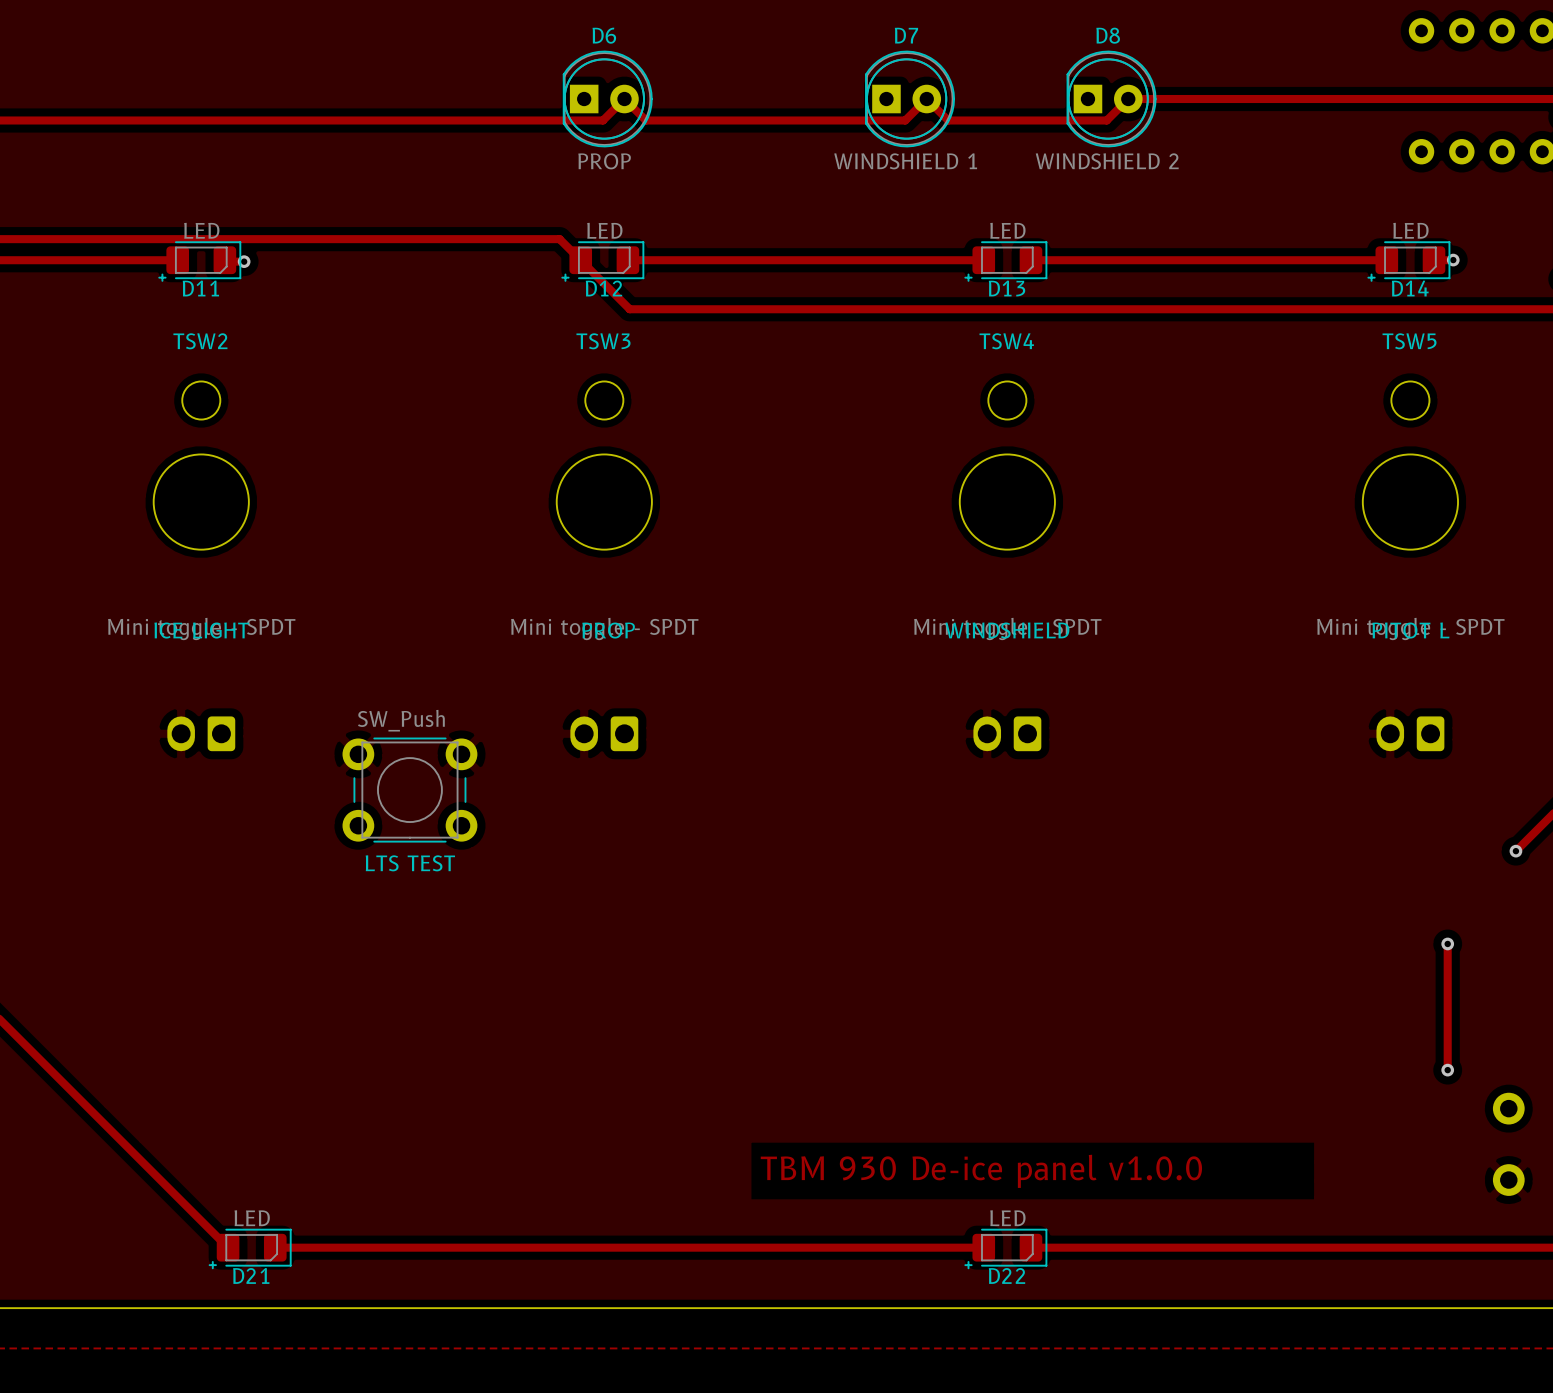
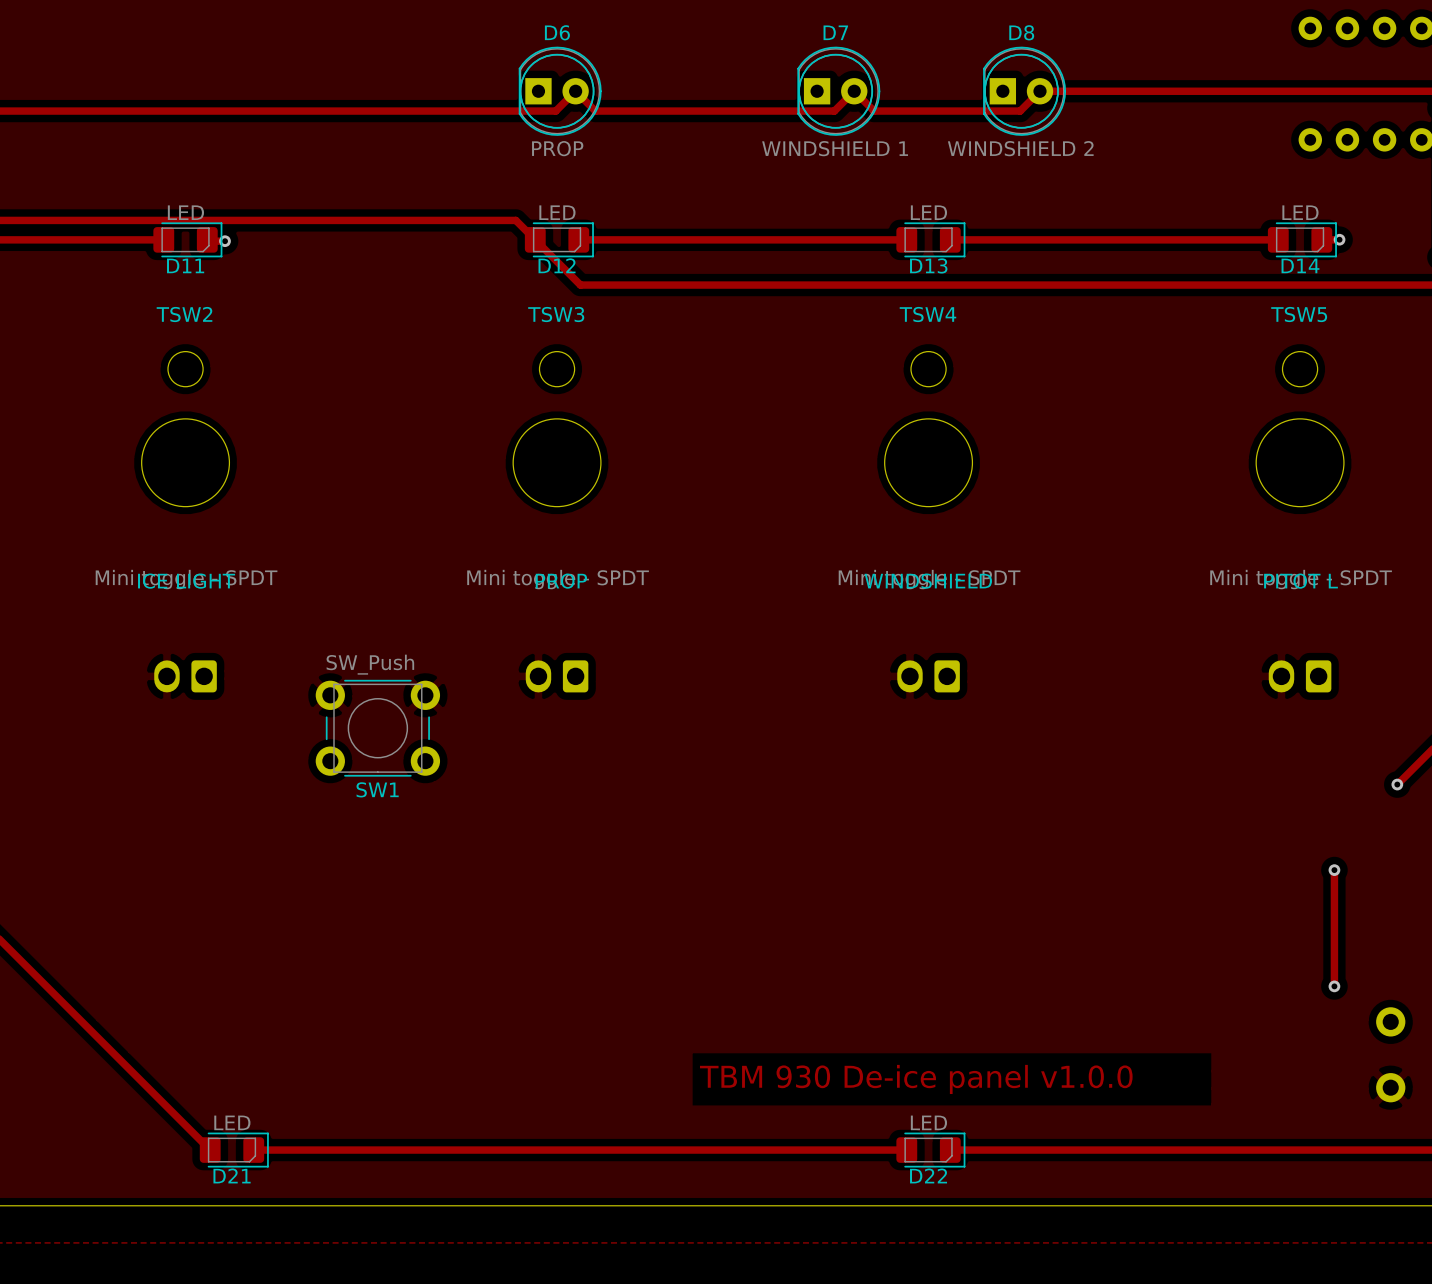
D11 footprint: [158, 241, 242, 282] -> [153, 222, 223, 258]
D12 footprint: [561, 241, 645, 282] -> [524, 222, 594, 258]
D13 footprint: [964, 241, 1048, 282] -> [896, 222, 966, 258]
D14 footprint: [1367, 241, 1451, 282] -> [1267, 222, 1337, 258]
LTS TEST name: LTS TEST (410, 863) -> SW1 (377, 789)
D21 footprint: [208, 1228, 292, 1270] -> [199, 1132, 269, 1168]
D22 footprint: [964, 1228, 1048, 1270] -> [896, 1132, 966, 1168]

